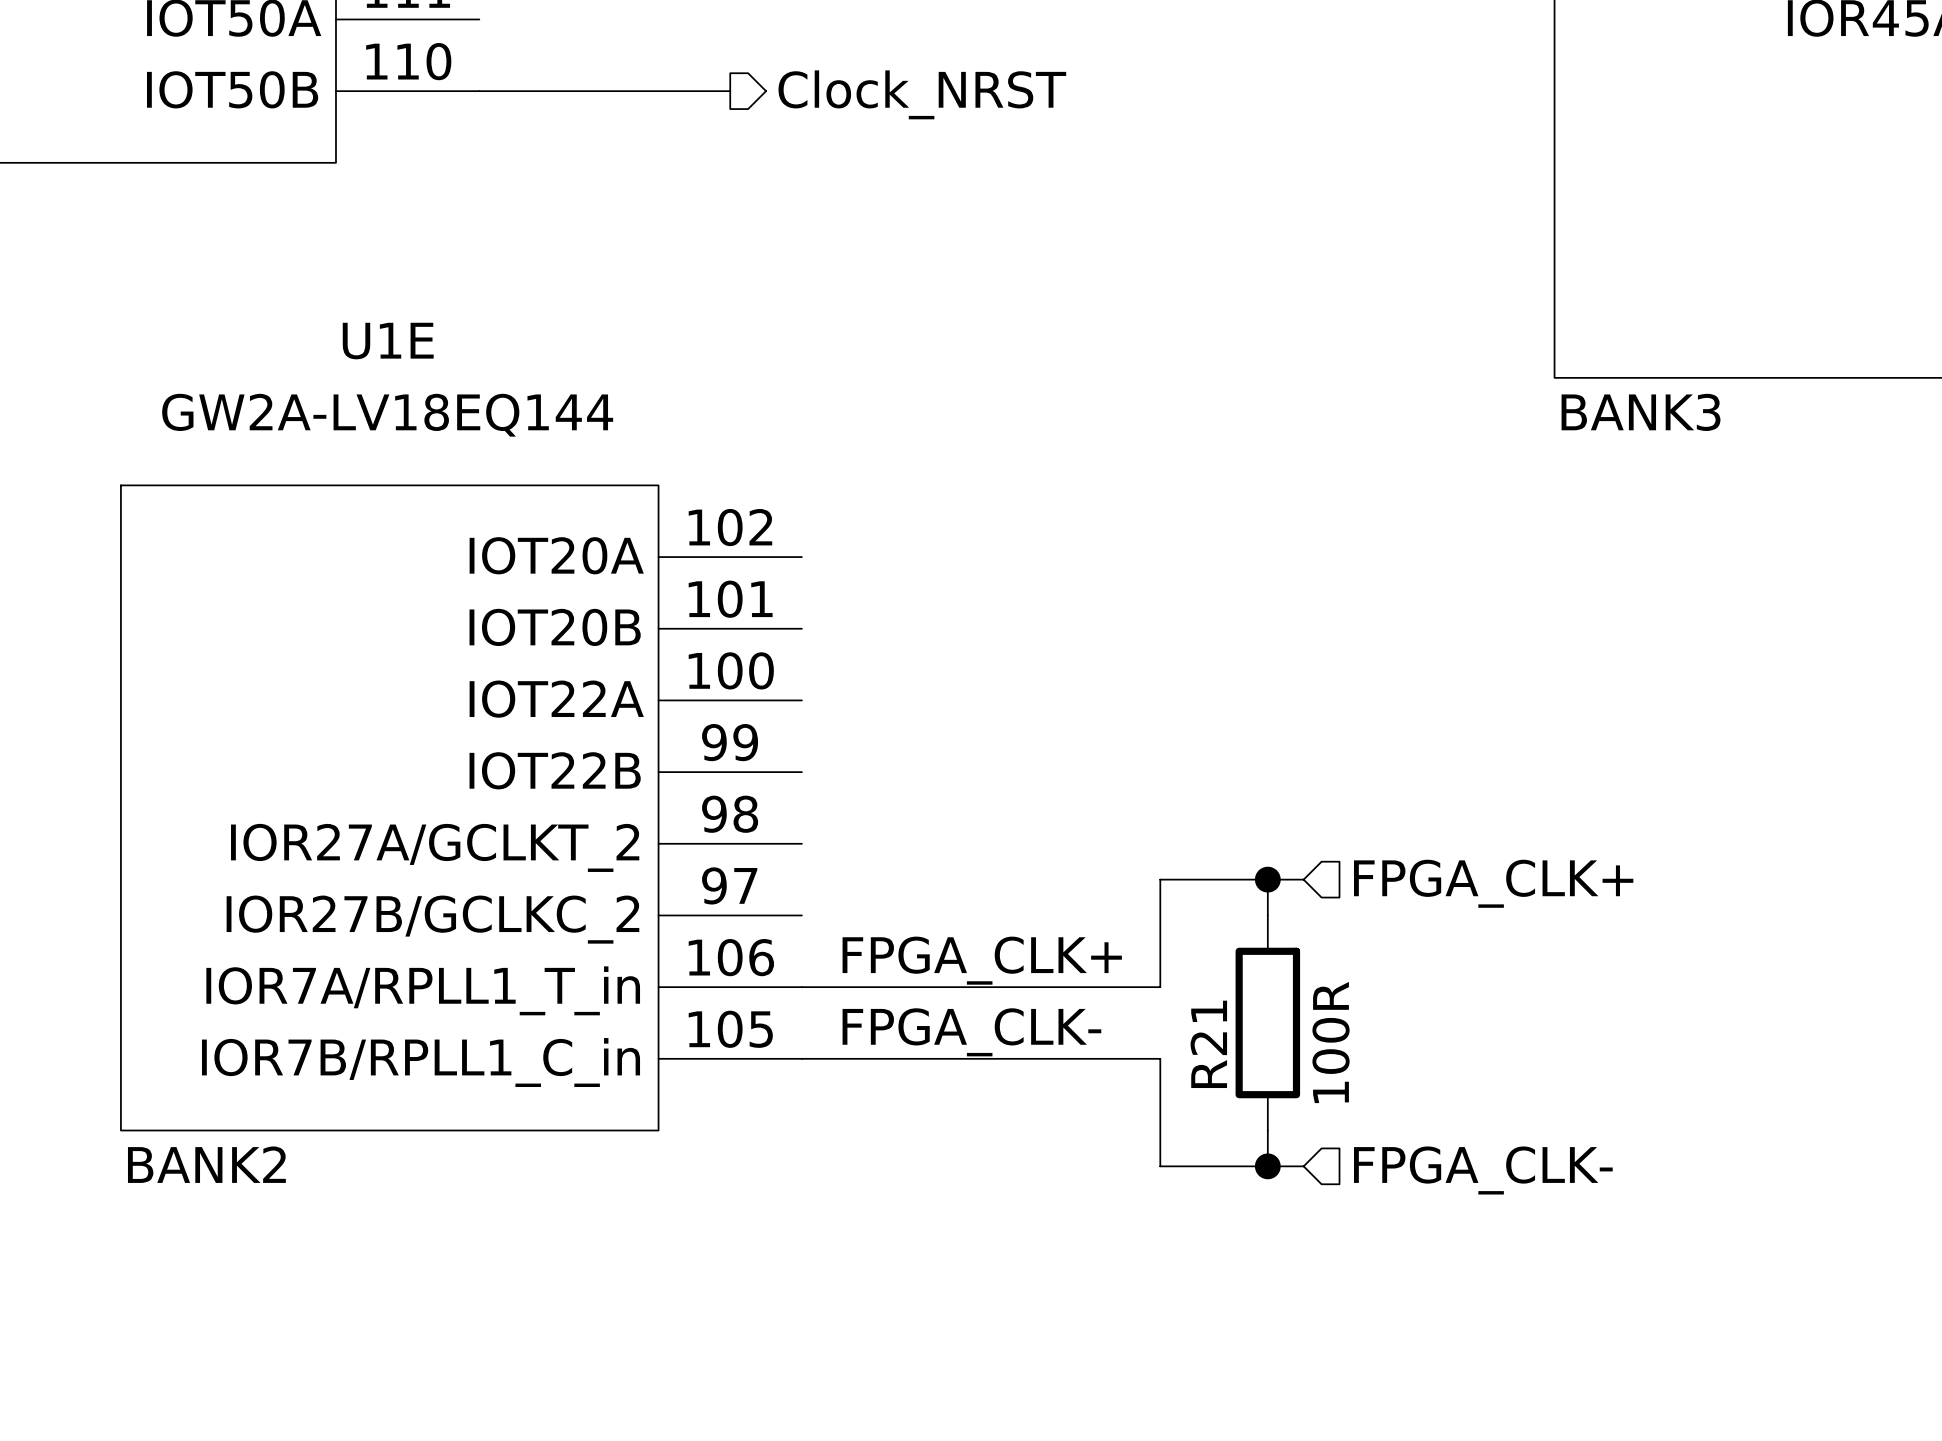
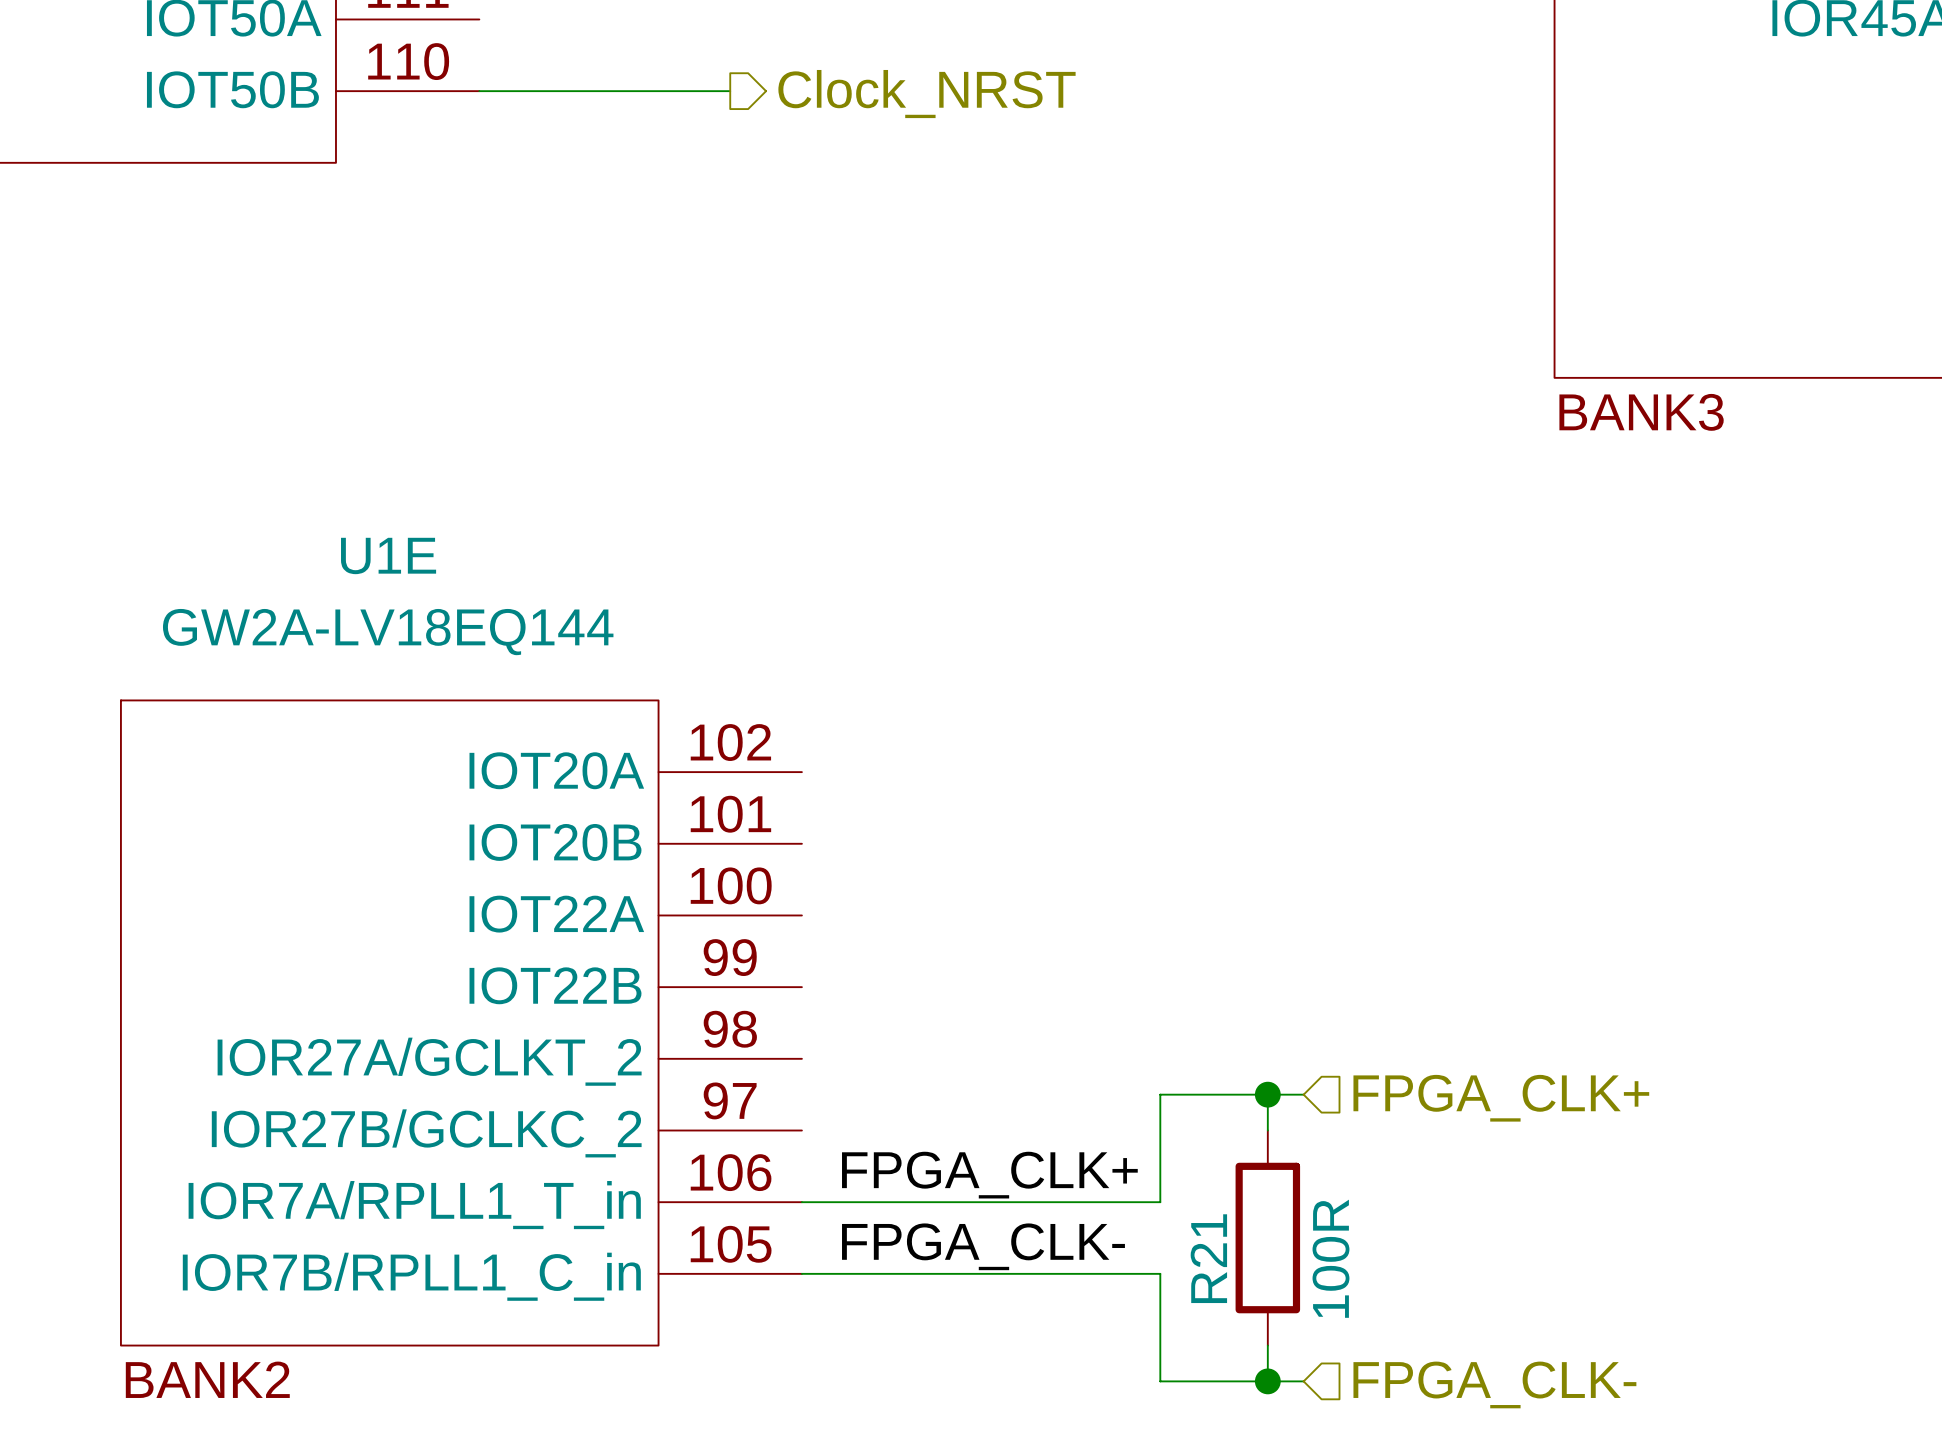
U1E position: (461, 807) -> (461, 1022)
wire: (1267, 879) (1267, 915) -> (1267, 1345) (1267, 1381)
junction: (1267, 879) -> none
wire: (1303, 879) (1160, 879) (1160, 987) (801, 987) -> none
hierarchical label position: FPGA_CLK+ (1493, 883) -> FPGA_CLK+ (1501, 1098)
label position: FPGA_CLK+ (982, 960) -> FPGA_CLK+ (989, 1175)
R21 position: (1267, 1022) -> (1267, 1238)
label position: FPGA_CLK- (971, 1032) -> FPGA_CLK- (983, 1246)
wire: (801, 1058) (1160, 1058) (1160, 1094) -> (1303, 1094) (1160, 1094)
wire: (1160, 1166) (1303, 1166) -> (1160, 1166) (1160, 1202) (801, 1202)
junction position: (1267, 1166) -> (1267, 1094)
hierarchical label position: FPGA_CLK- (1483, 1170) -> FPGA_CLK- (1494, 1384)
wire: none -> (801, 1273) (1160, 1273) (1160, 1381) (1303, 1381)
junction: none -> (1267, 1381)

